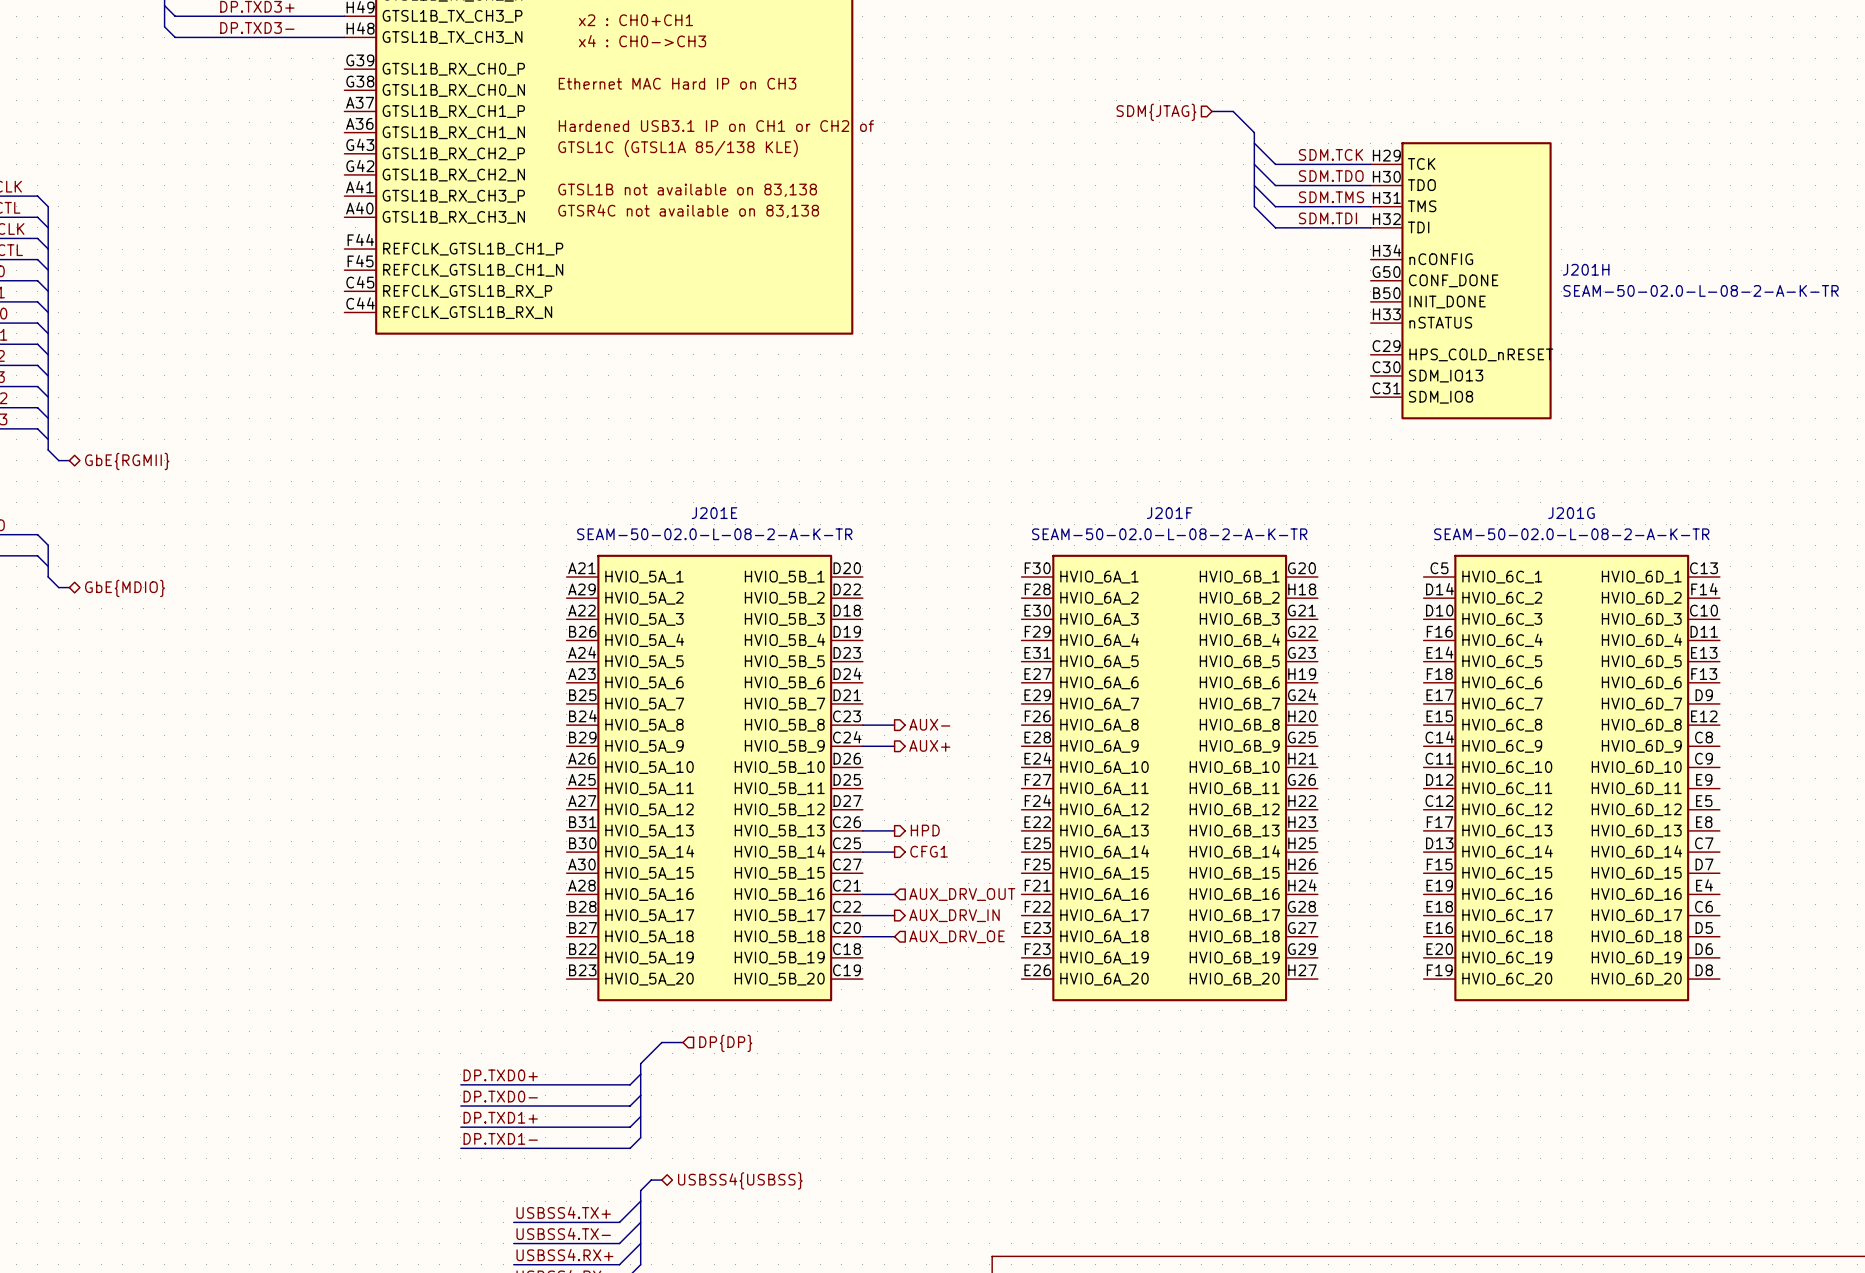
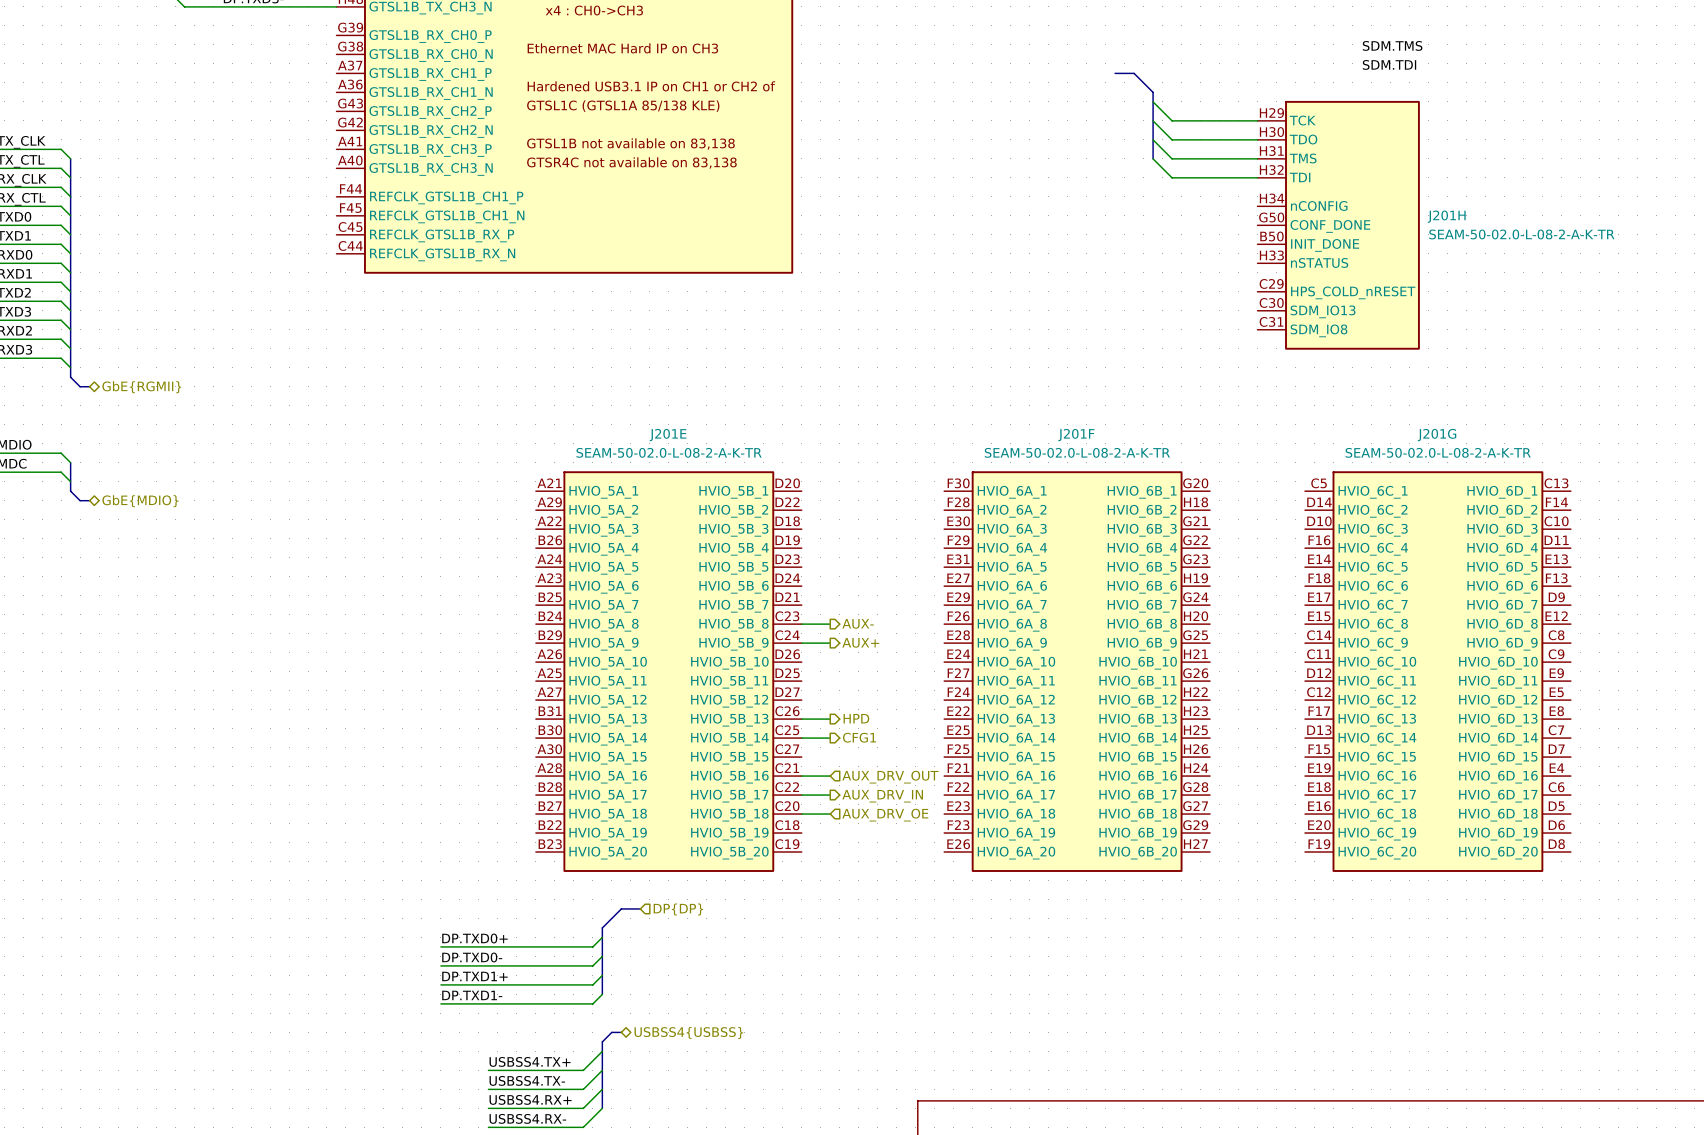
label: none -> SDM.TMS (1392, 45)
label: none -> SDM.TDI (1389, 64)
hierarchical label: SDM{JTAG} (1156, 112) -> none
label: SDM.TCK (1331, 154) -> none
label: SDM.TDO (1331, 176) -> none
label: SDM.TMS (1331, 197) -> none
label: SDM.TDI (1327, 218) -> none

